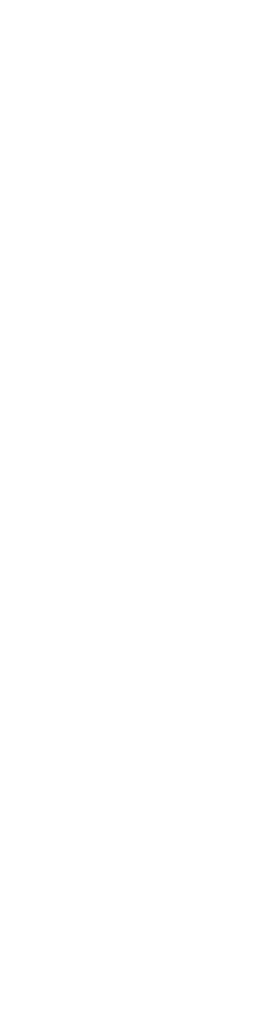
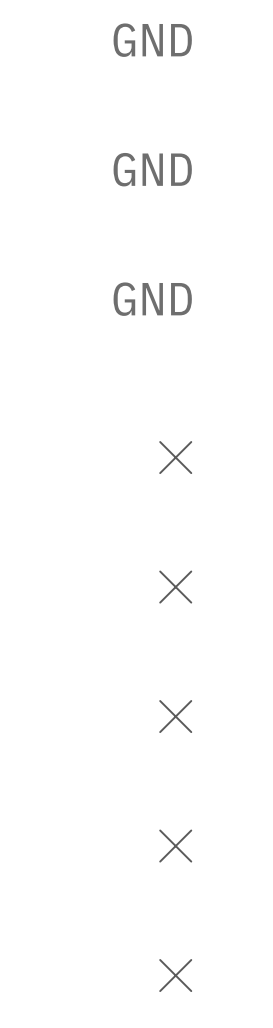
label: none -> GND (152, 40)
label: none -> GND (152, 169)
label: none -> GND (152, 299)
no-connect mark: none -> (175, 457)
no-connect mark: none -> (175, 587)
no-connect mark: none -> (175, 716)
no-connect mark: none -> (175, 846)
no-connect mark: none -> (175, 975)

